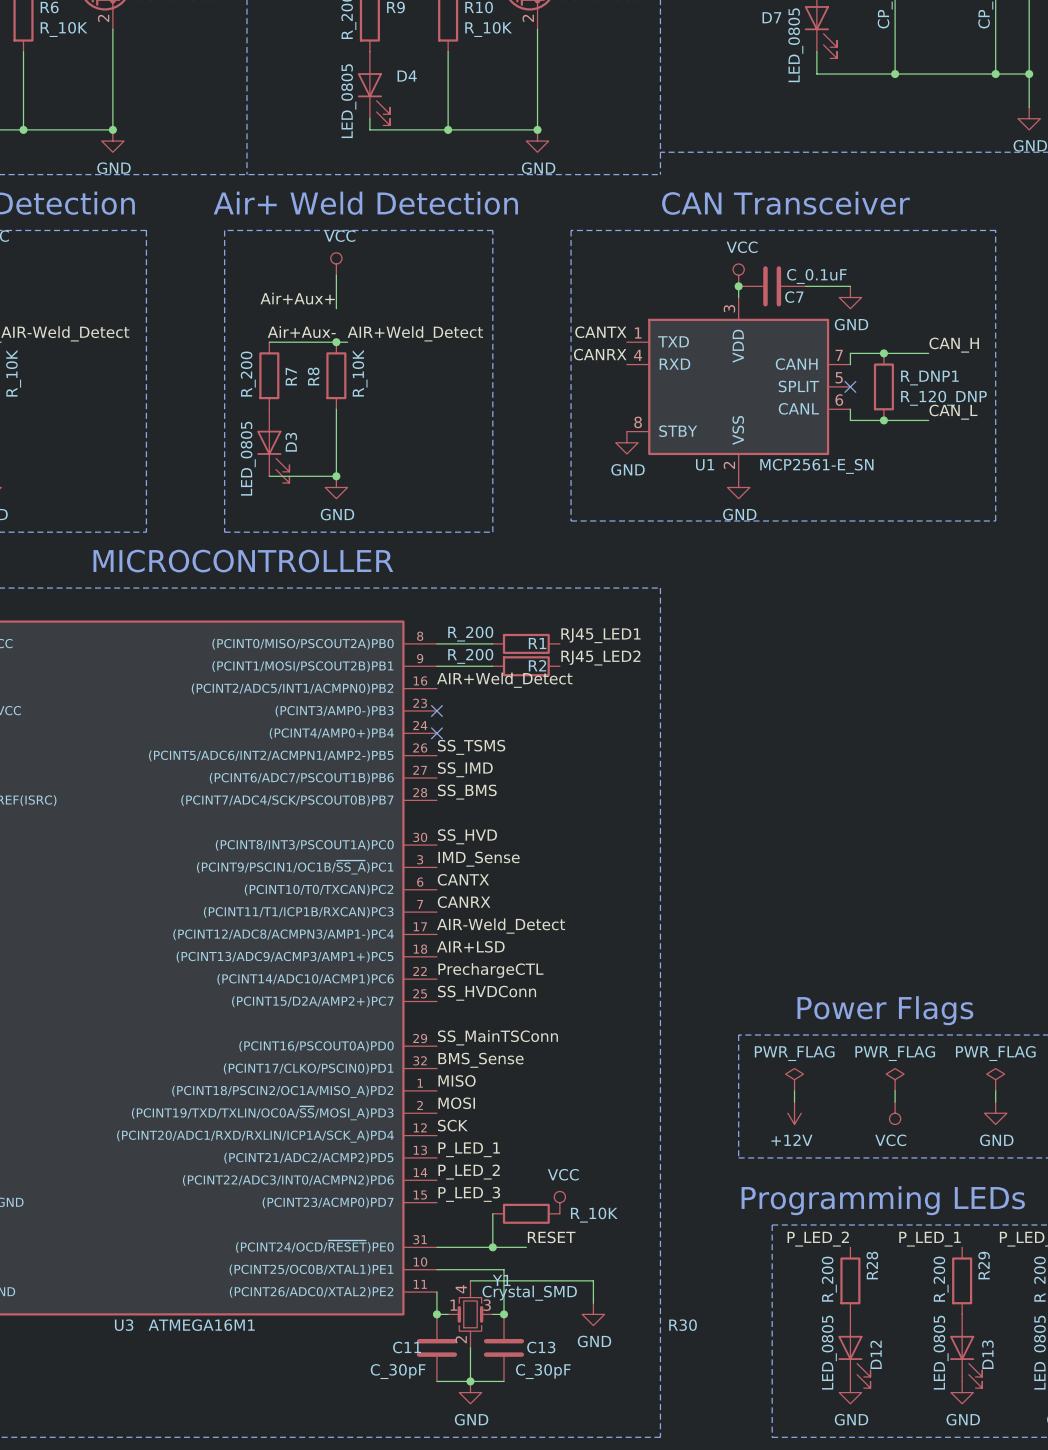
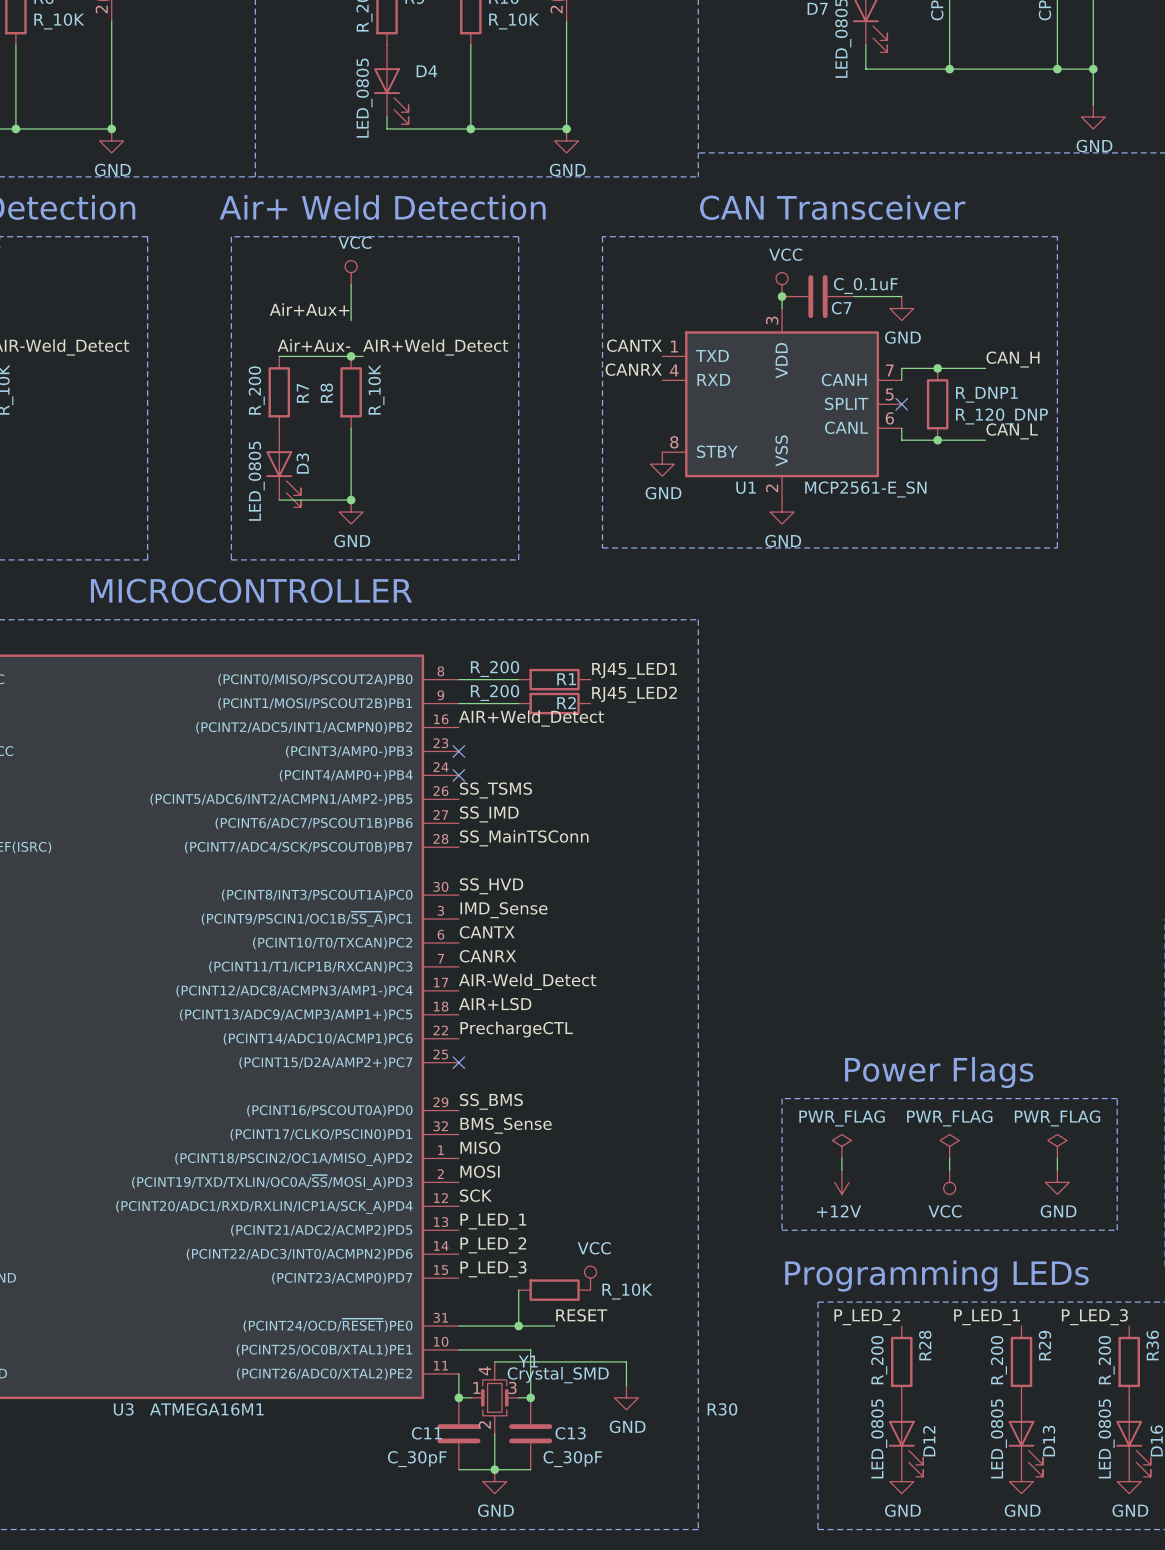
label: SS_BMS (467, 792) -> SS_MainTSConn (524, 838)
label: SS_HVDConn (487, 993) -> none
no-connect mark: none -> (458, 1062)
label: SS_MainTSConn (497, 1037) -> SS_BMS (491, 1101)

